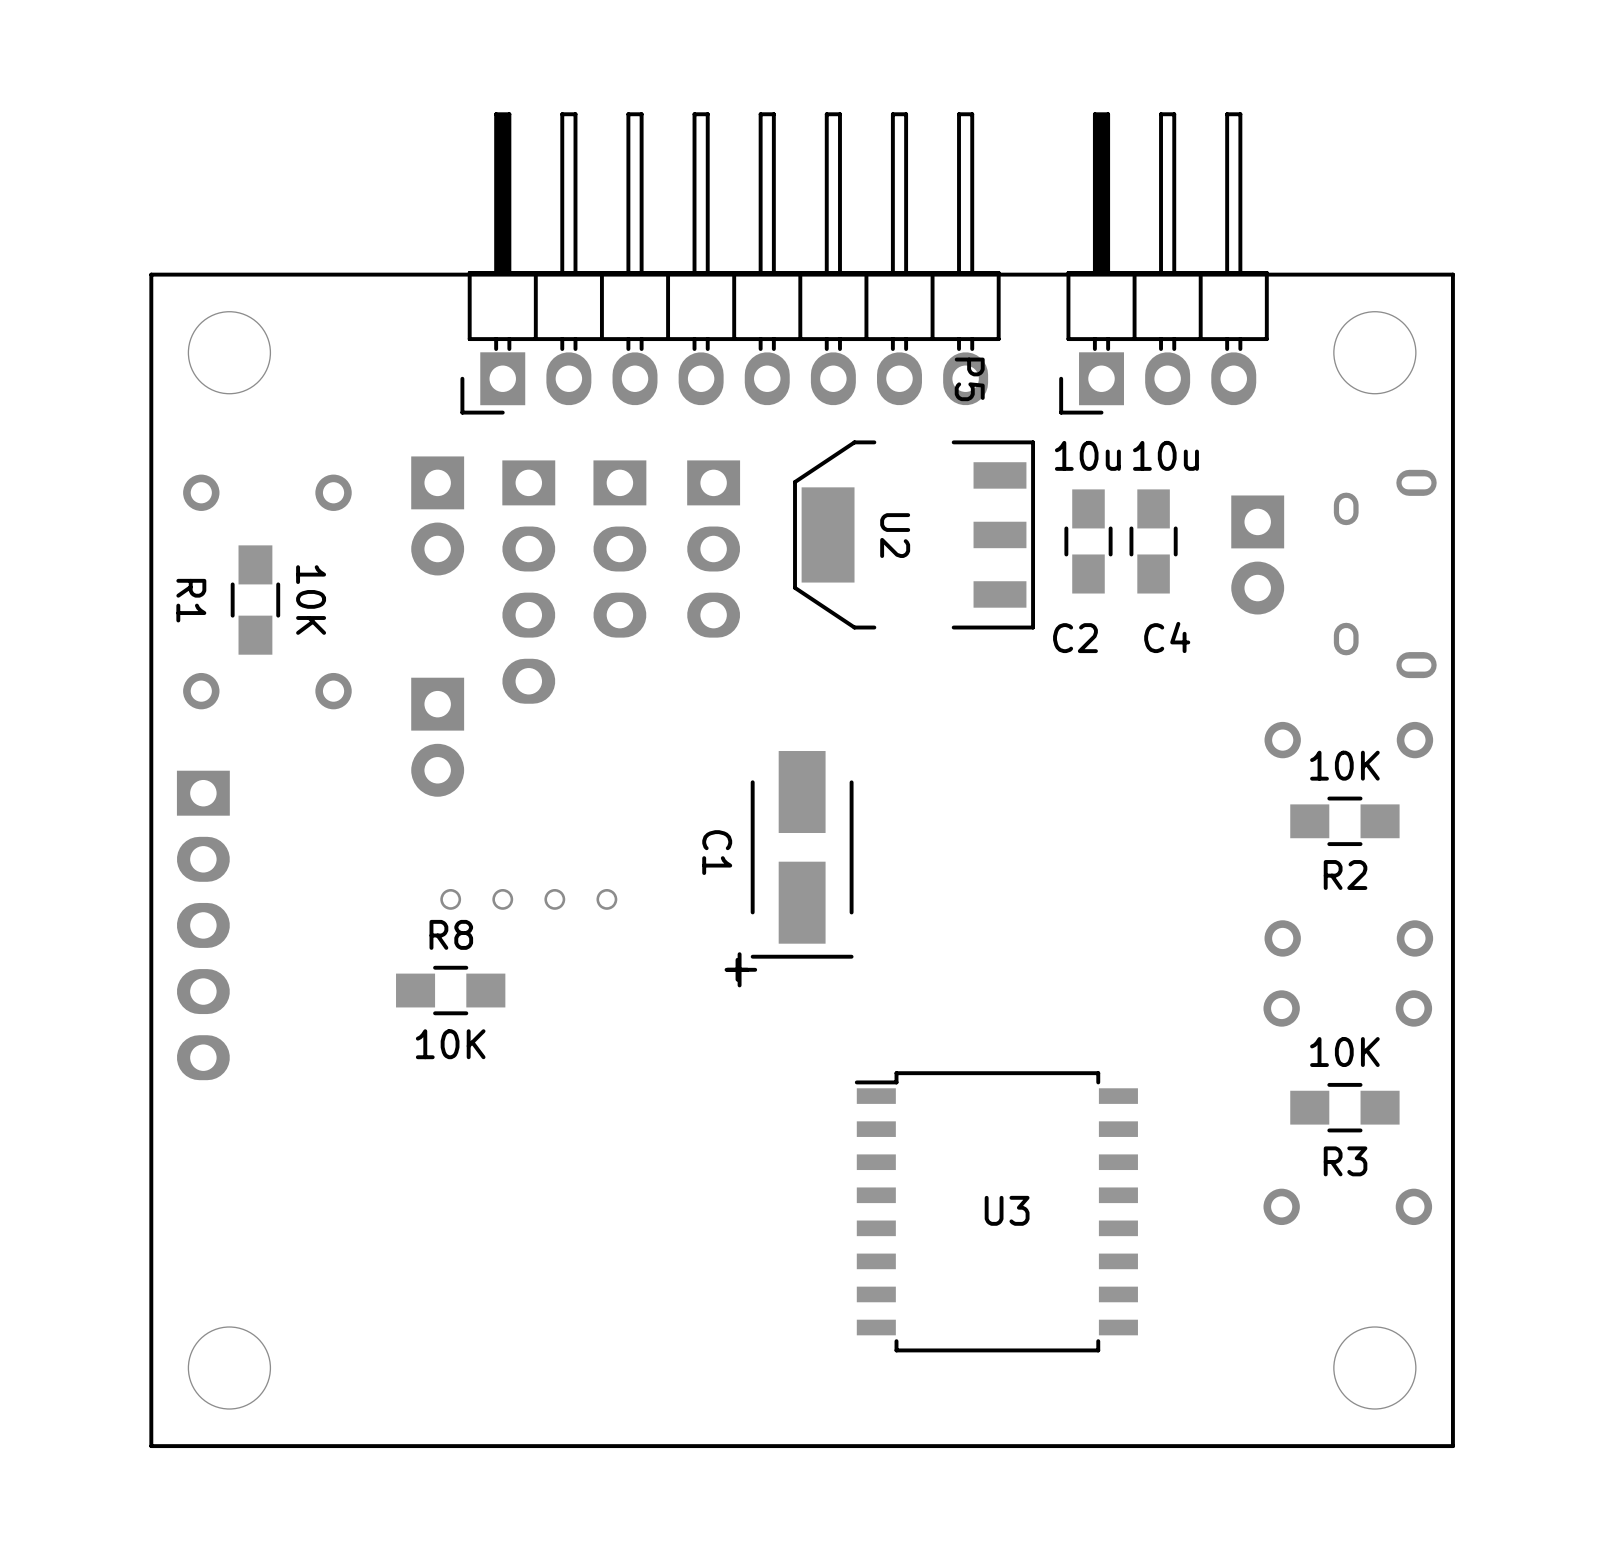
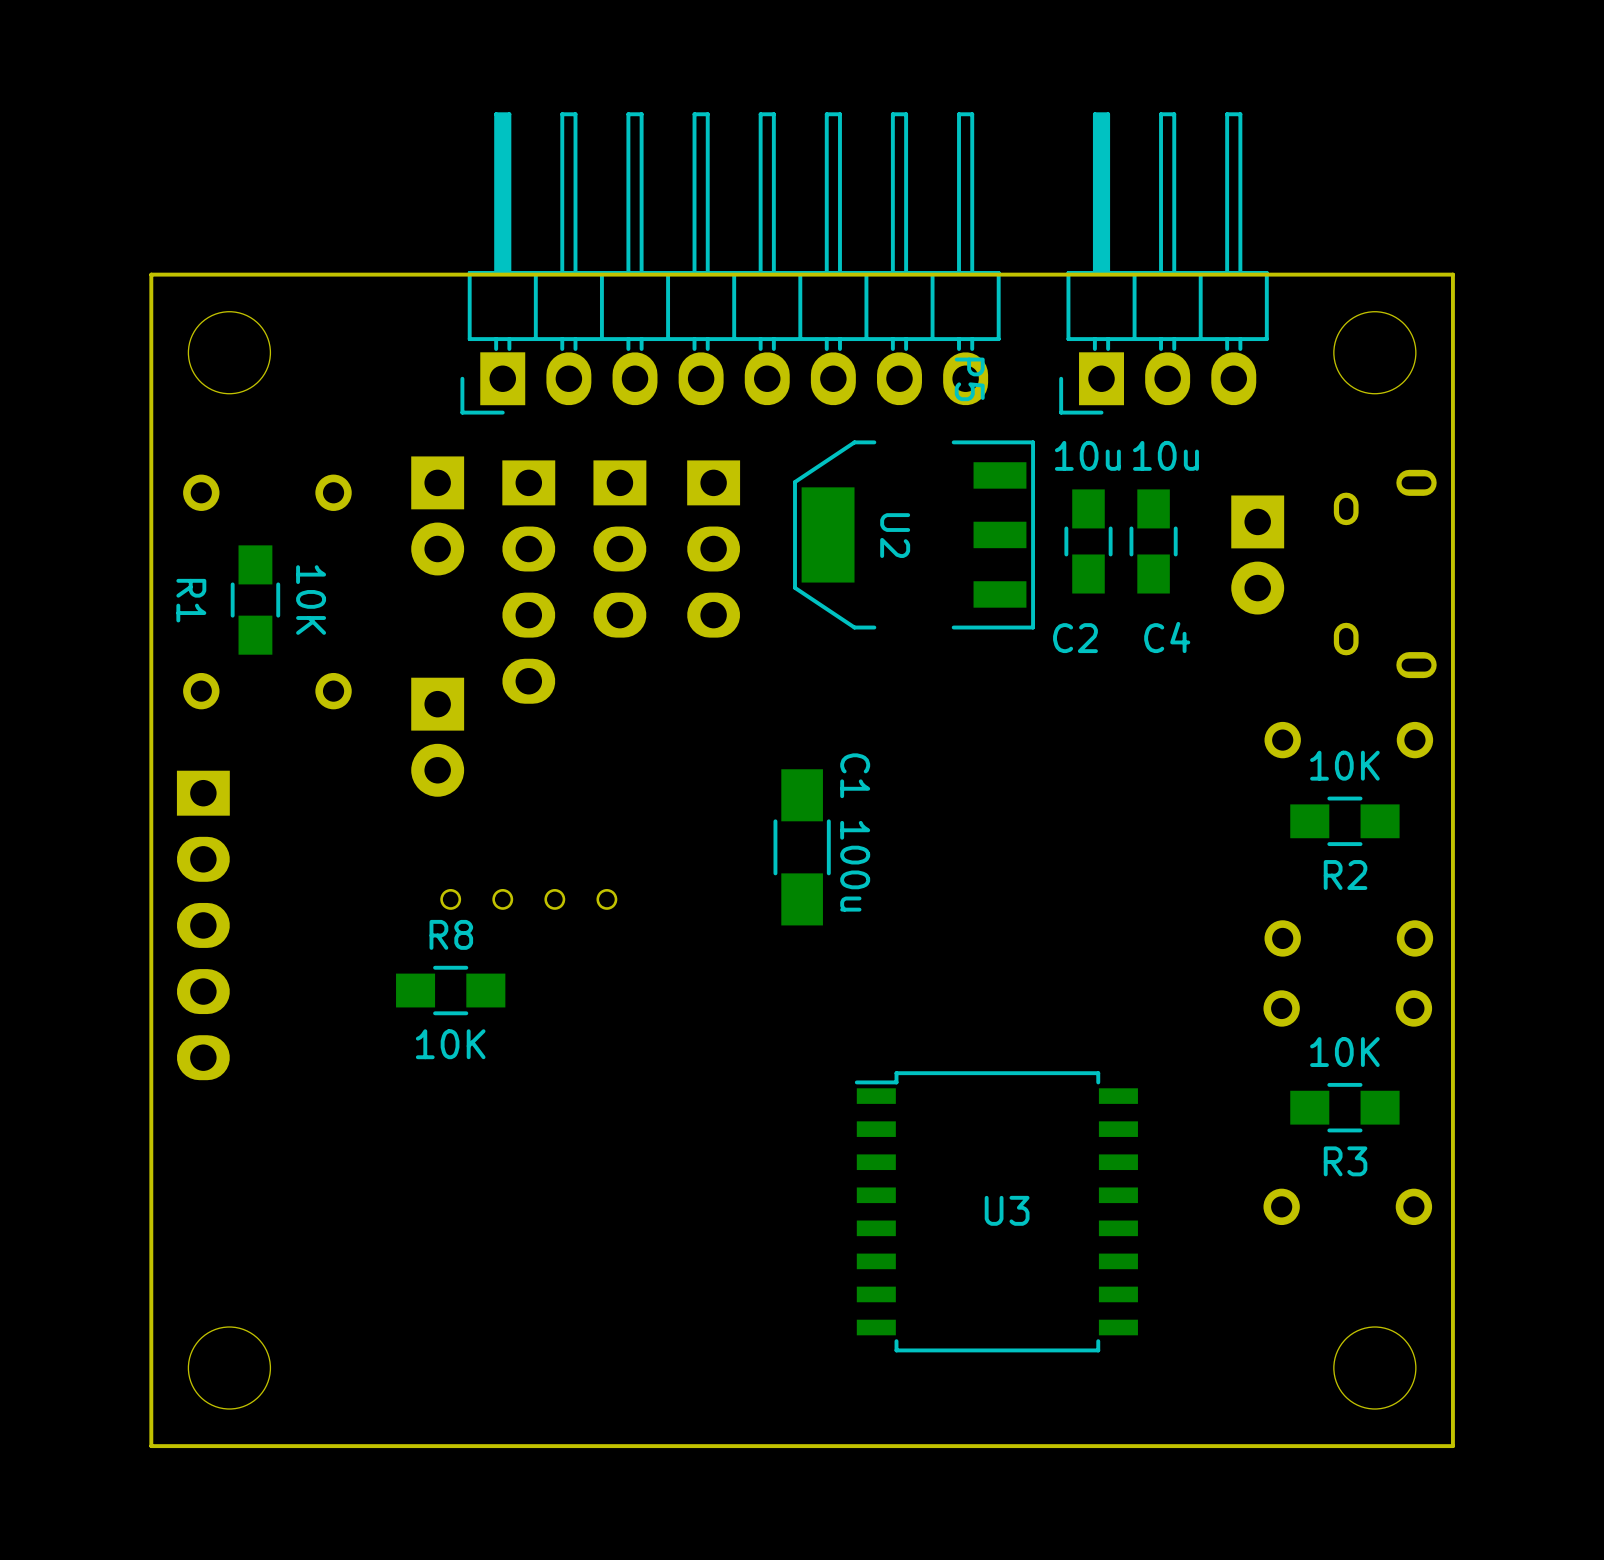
C1 footprint: [724, 751, 854, 988] -> [773, 769, 831, 926]
C1 name position: C1 (717, 852) -> C1 (855, 775)
C1 value: none -> 100u (855, 866)

